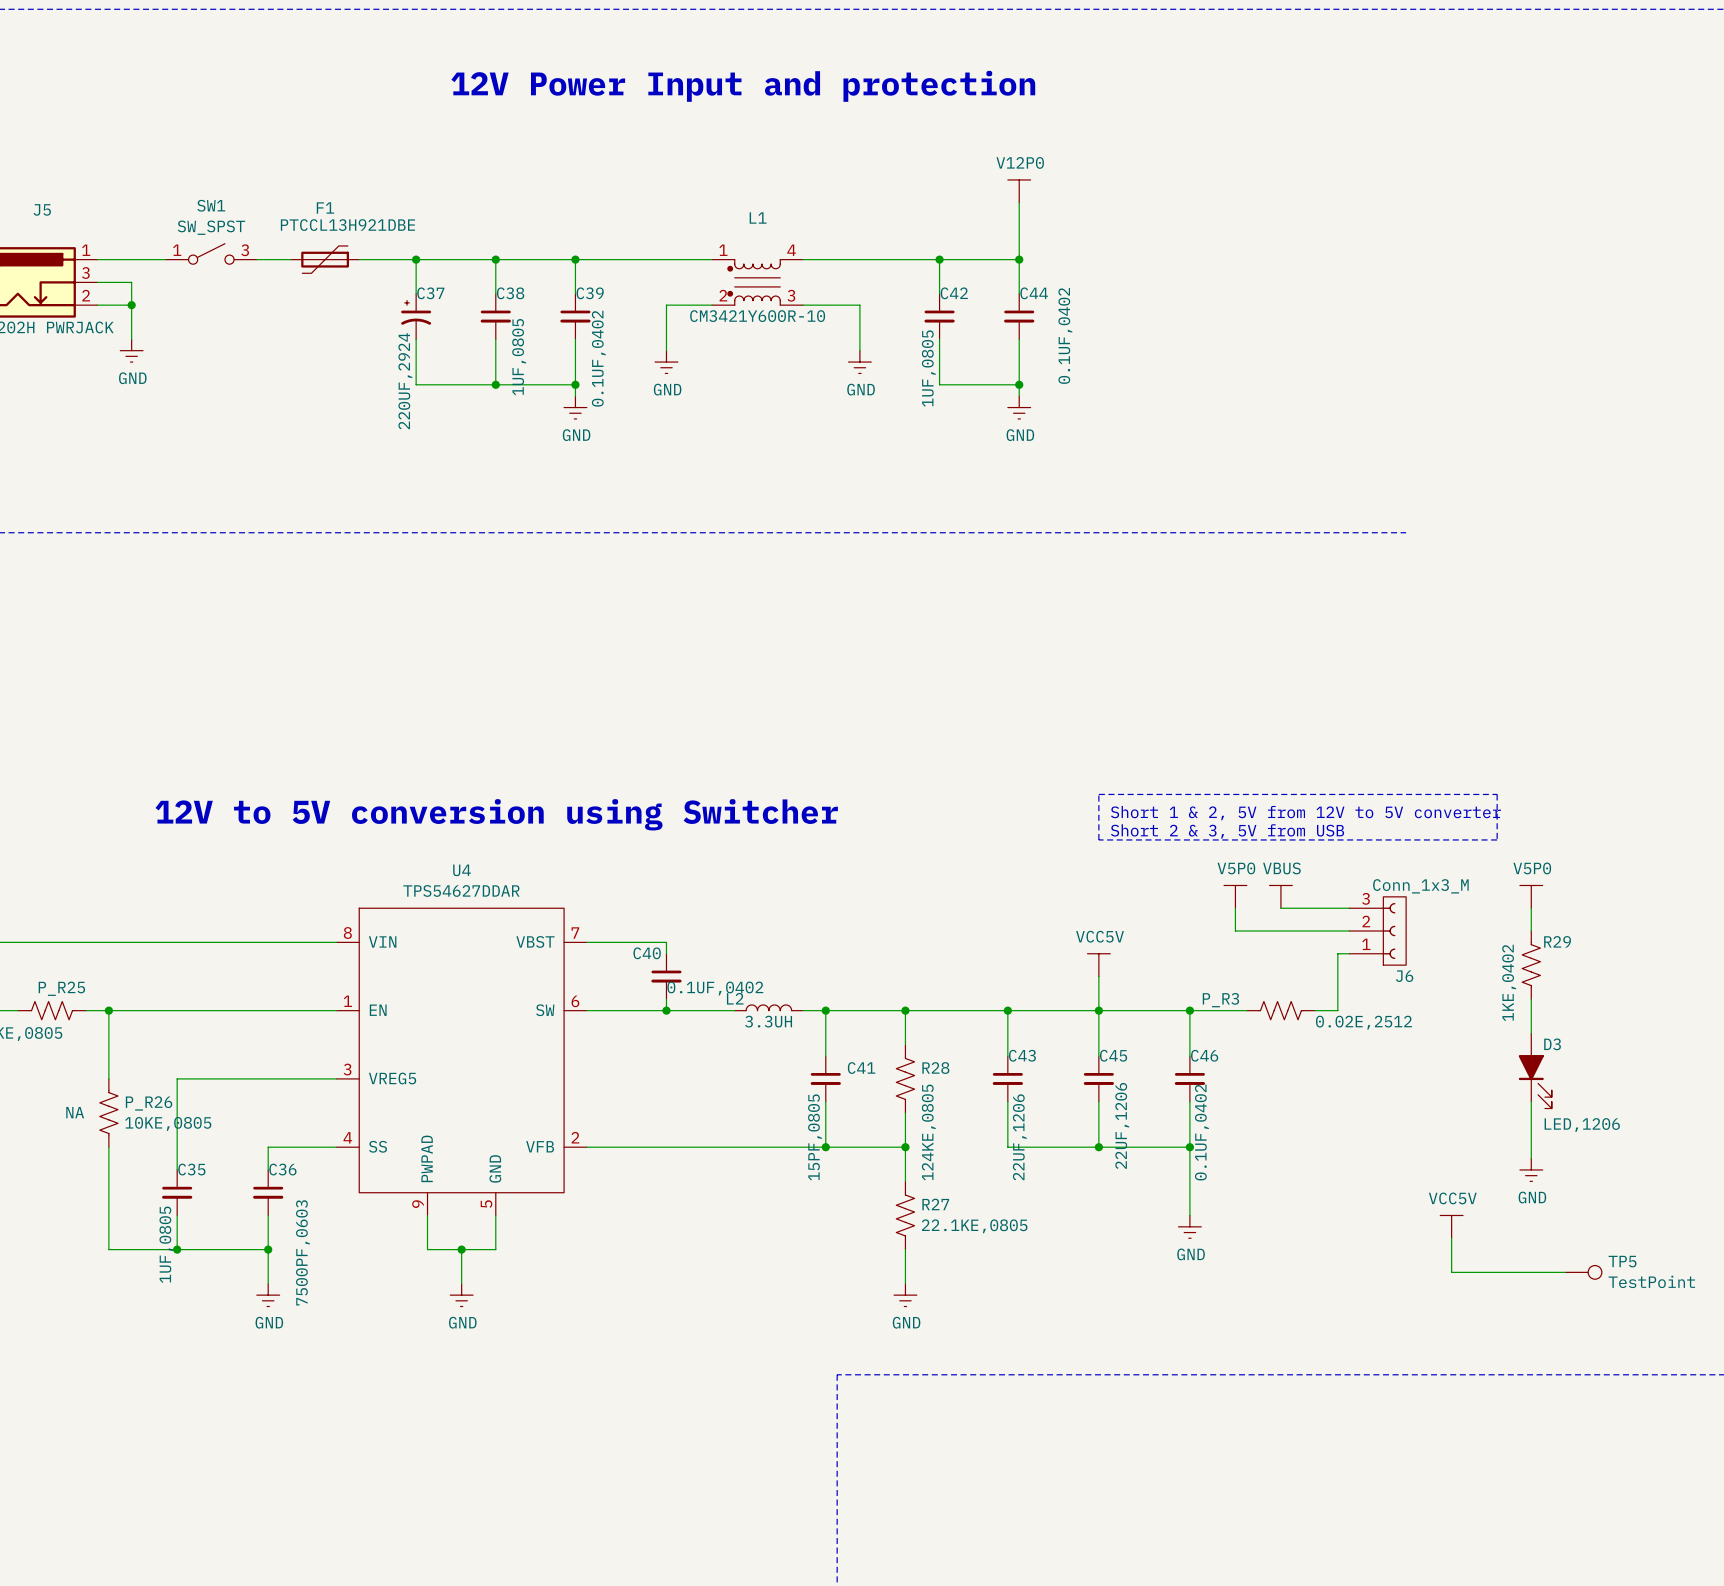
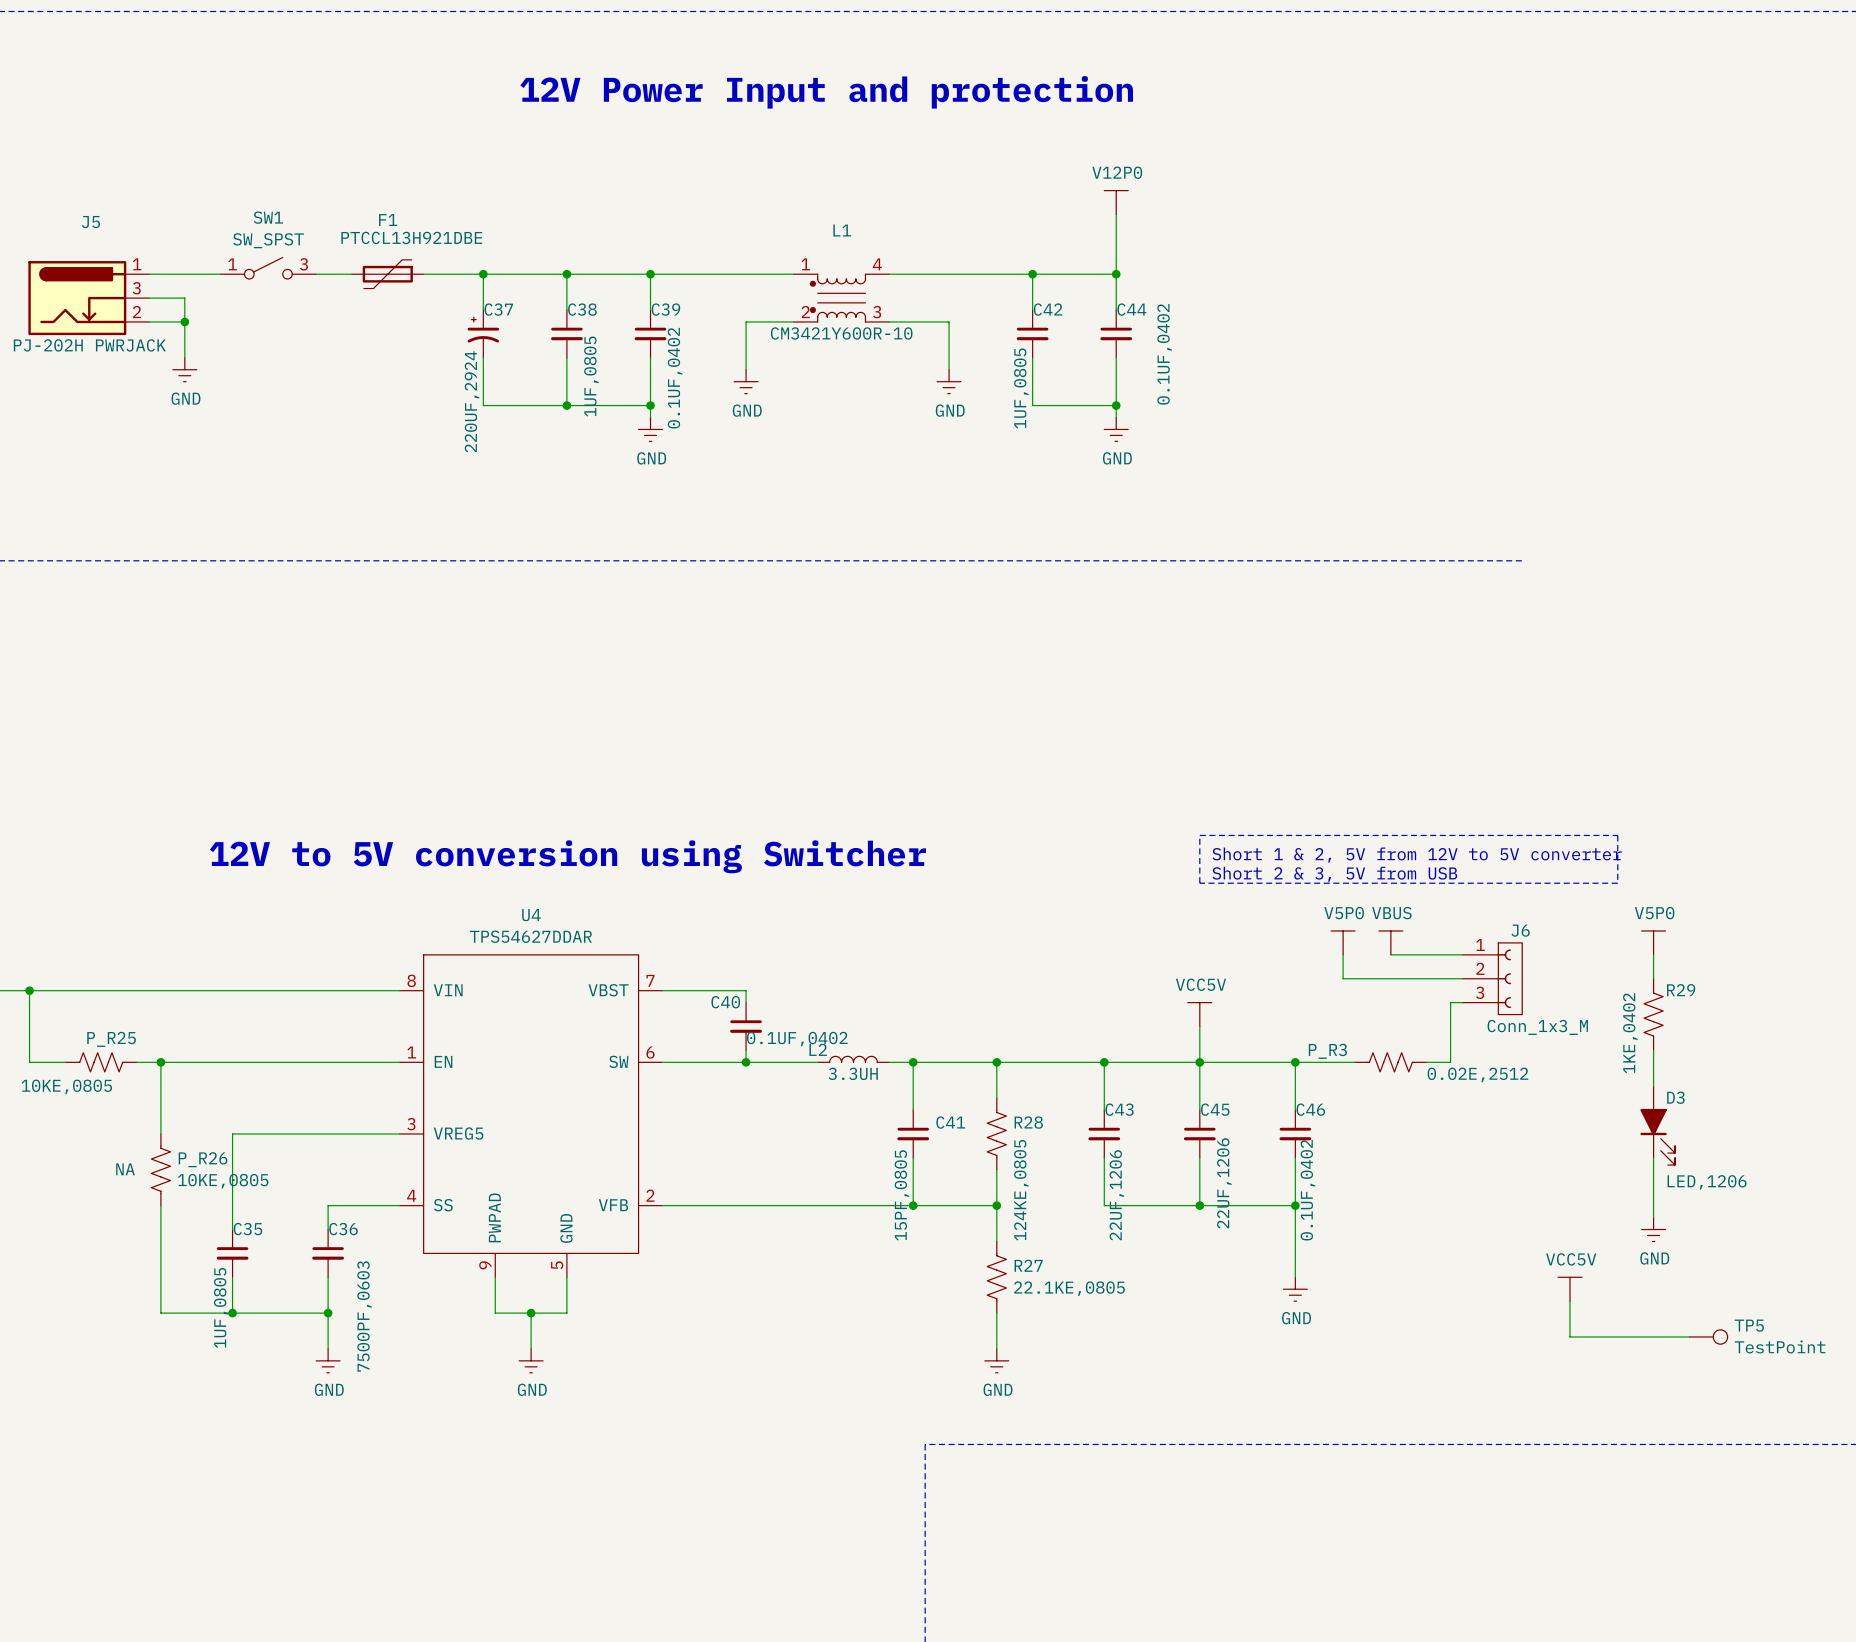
J6 flip: as is (1394, 931) -> up-down (1509, 978)

